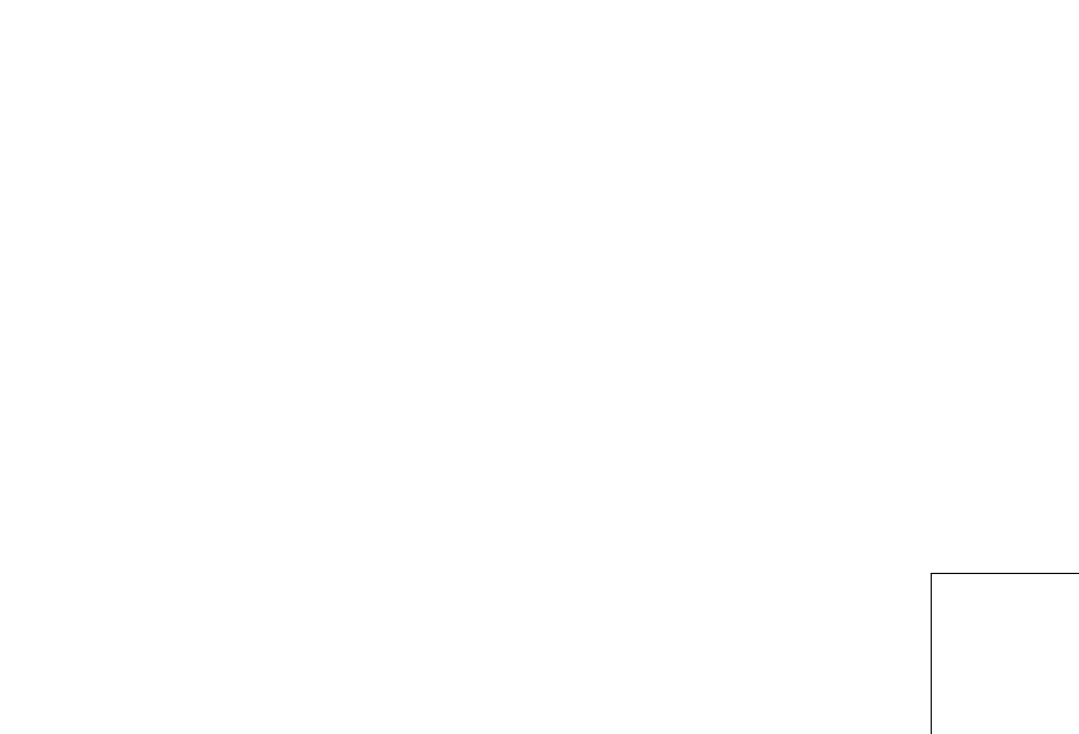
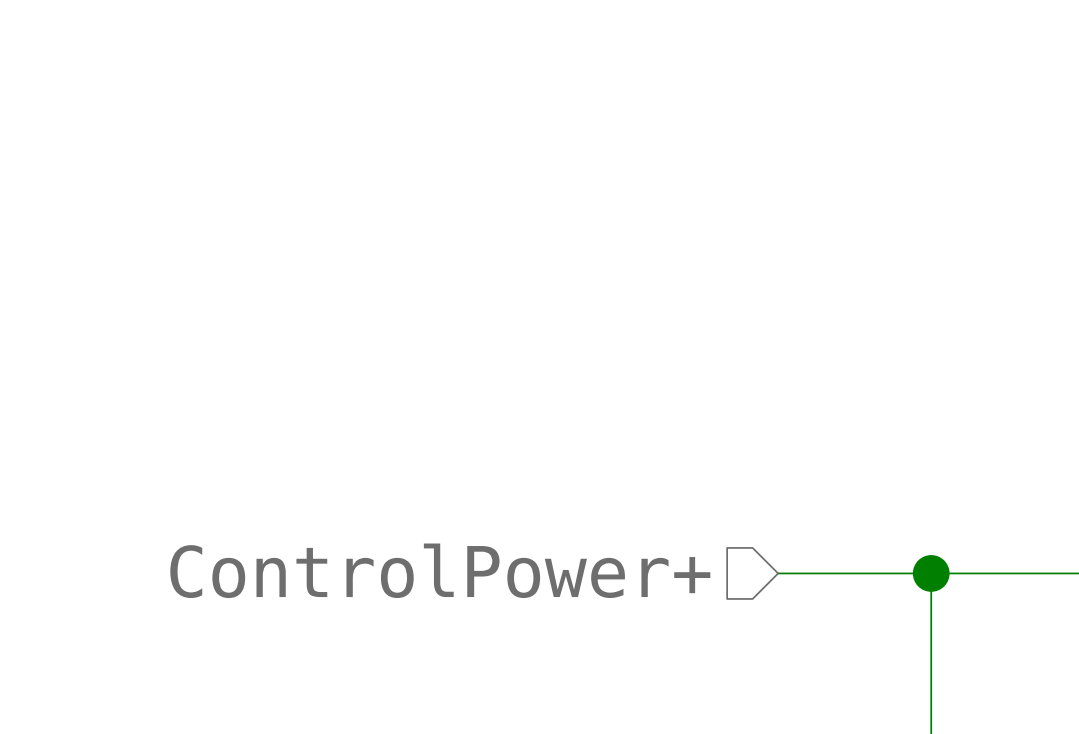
hierarchical label: none -> ControlPower+ (440, 570)
wire: none -> (778, 573) (931, 573)
junction: none -> (931, 573)

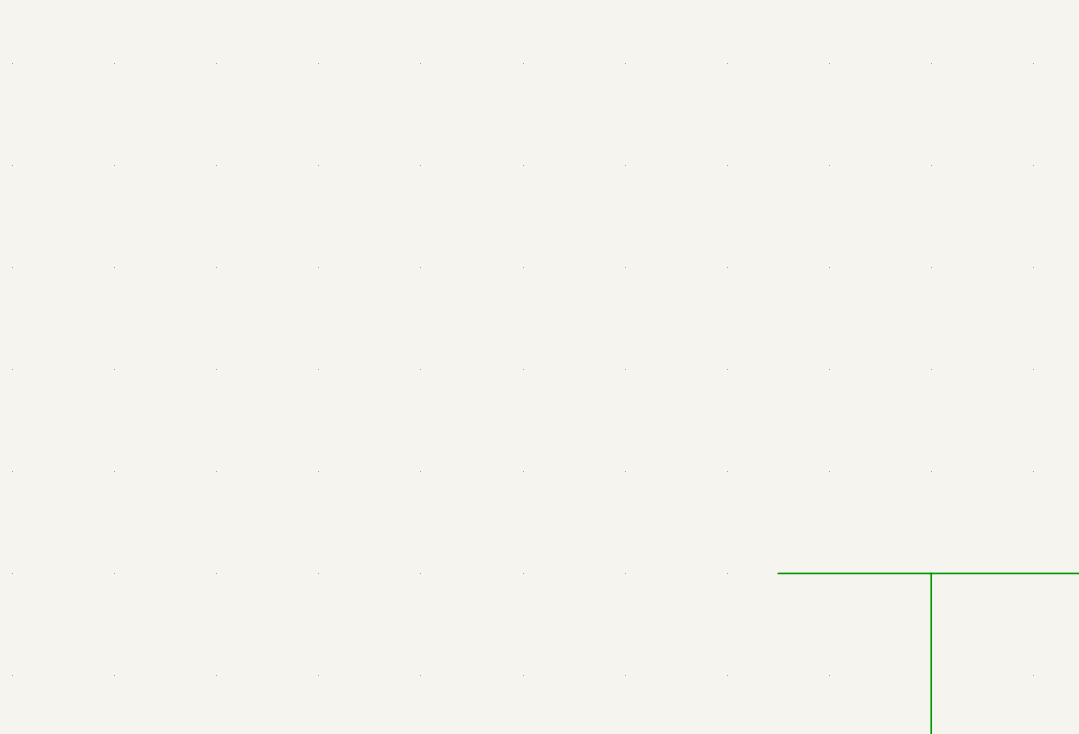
hierarchical label: ControlPower+ (440, 570) -> none
junction: (931, 573) -> none

